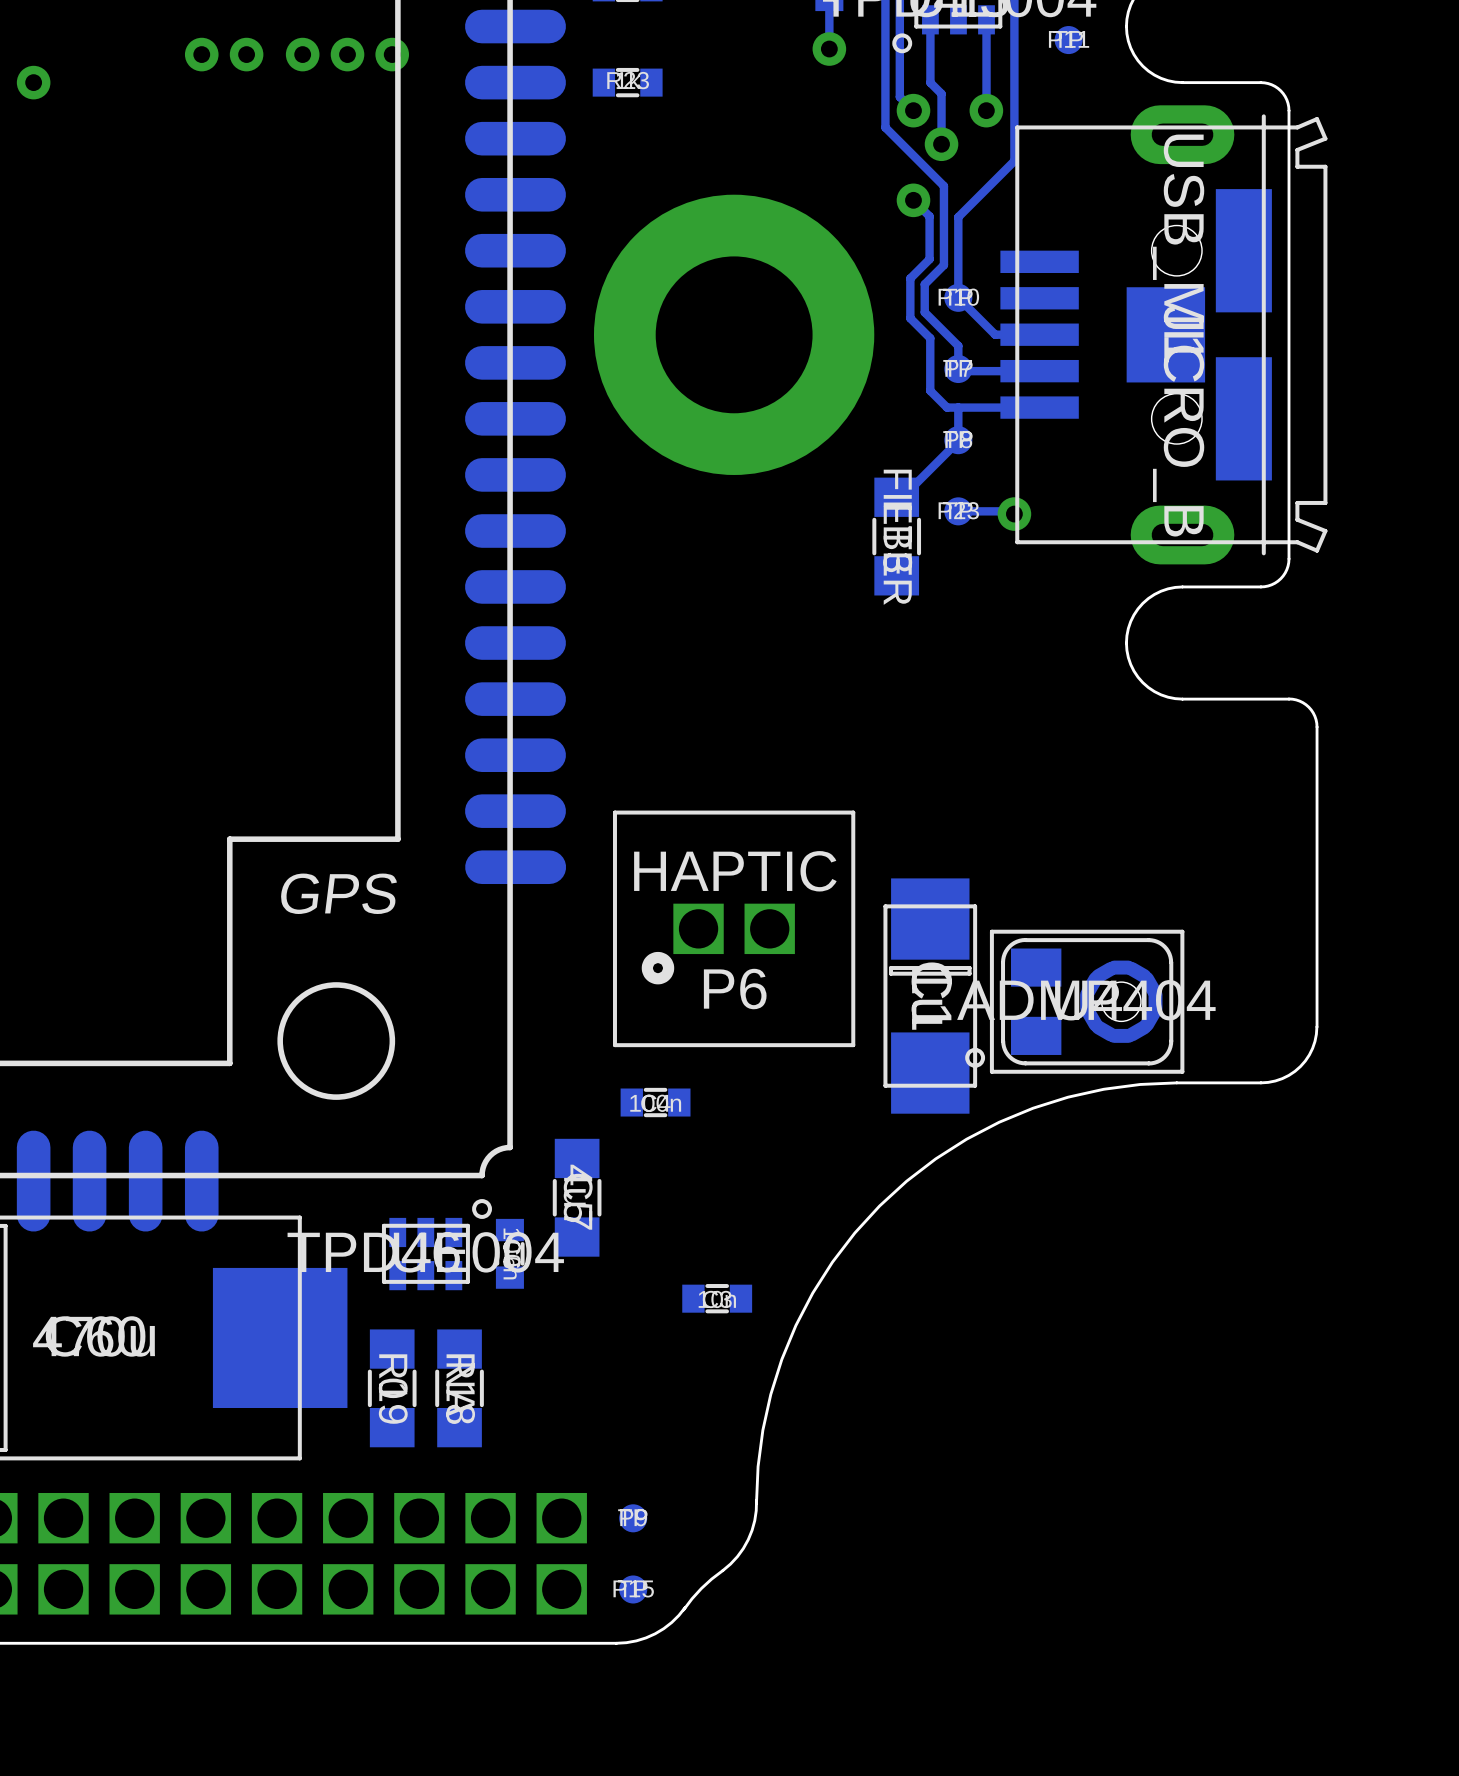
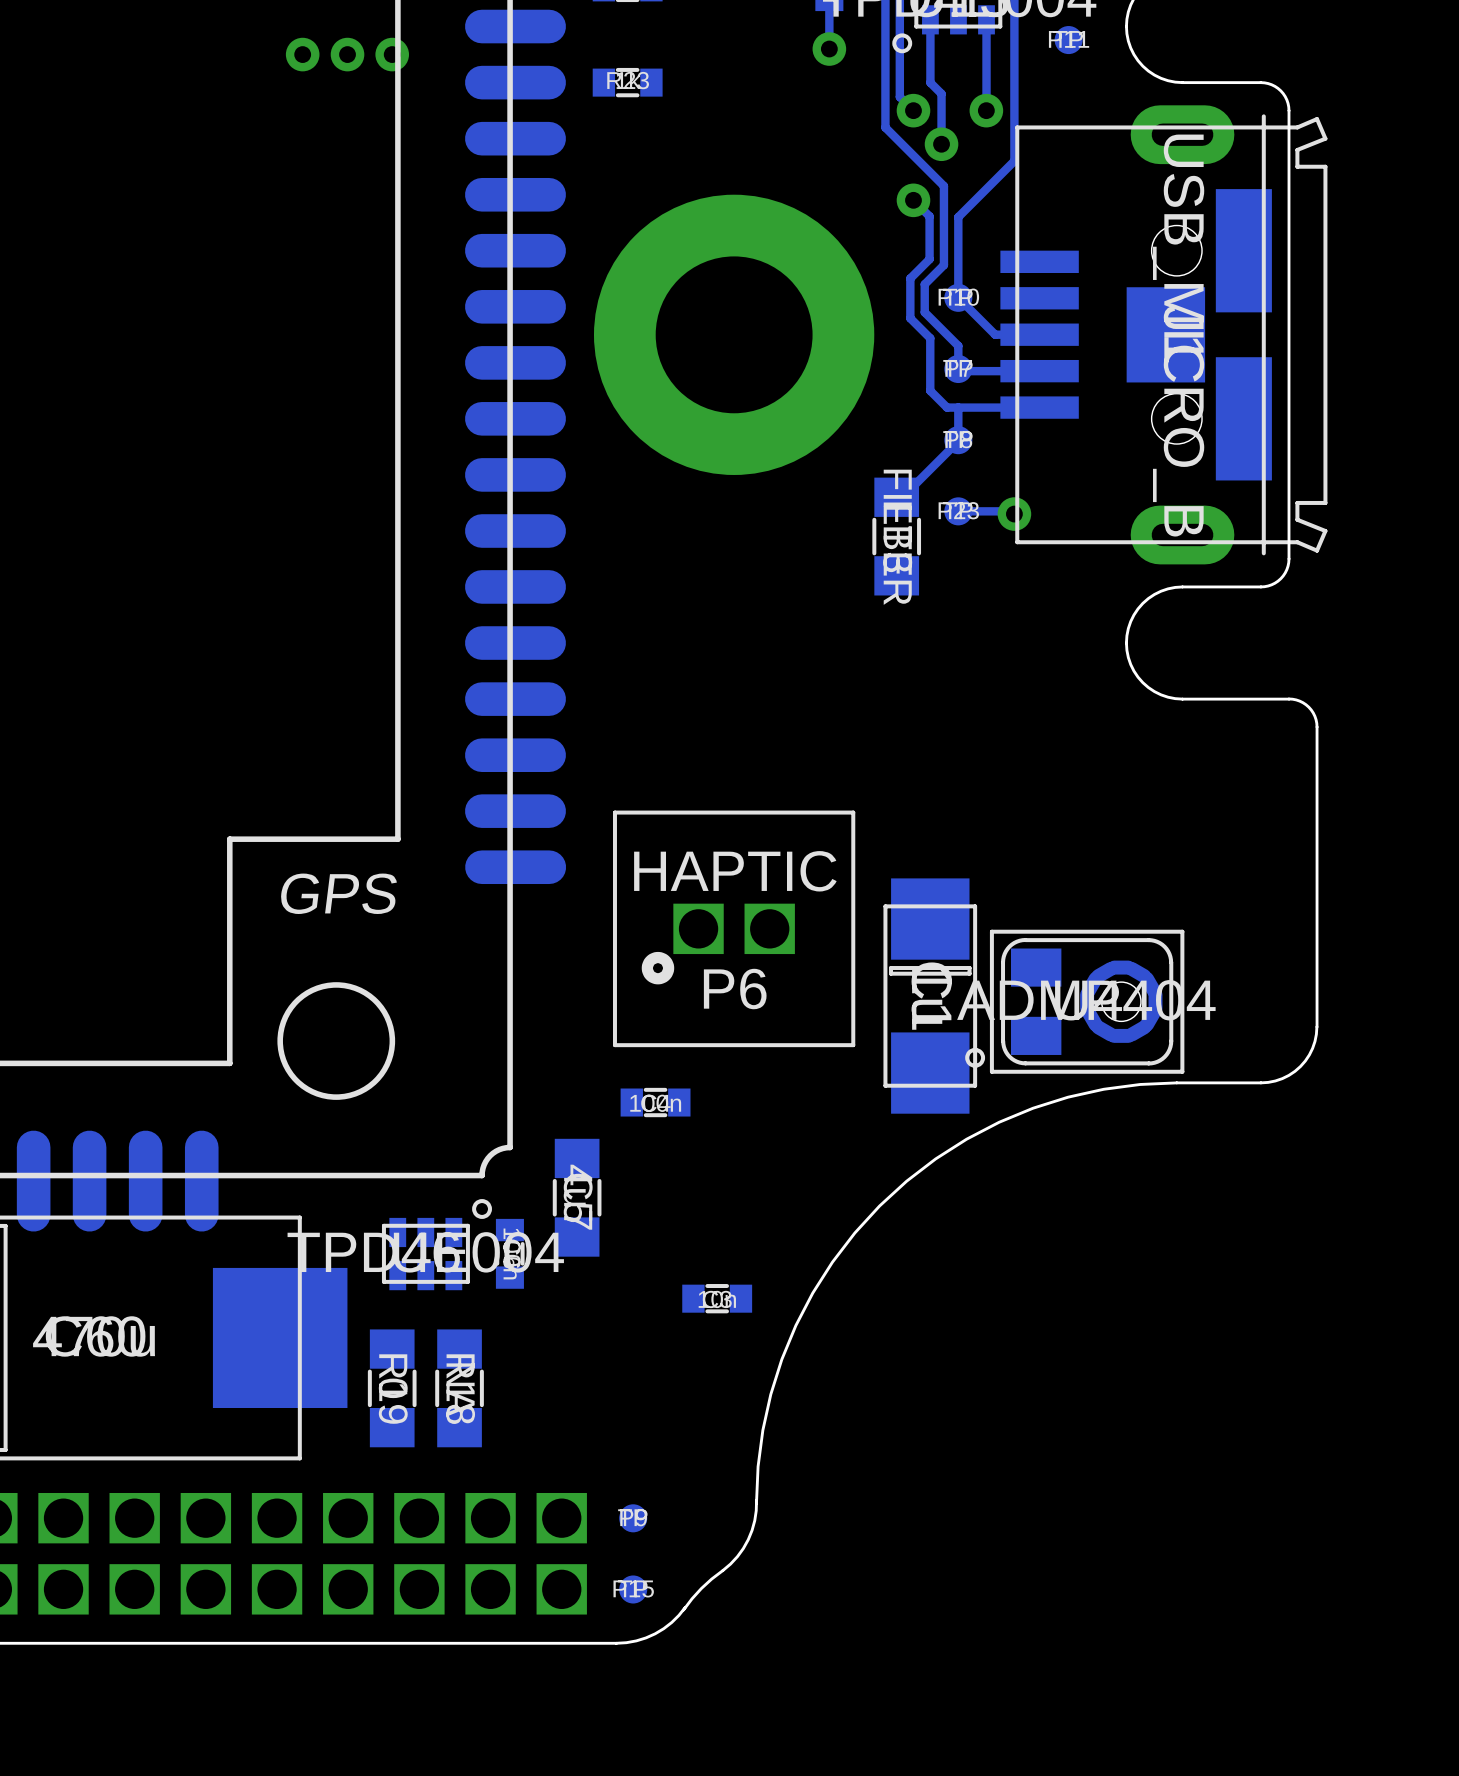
via: (201, 54) -> none
via: (246, 54) -> none
via: (33, 82) -> none

